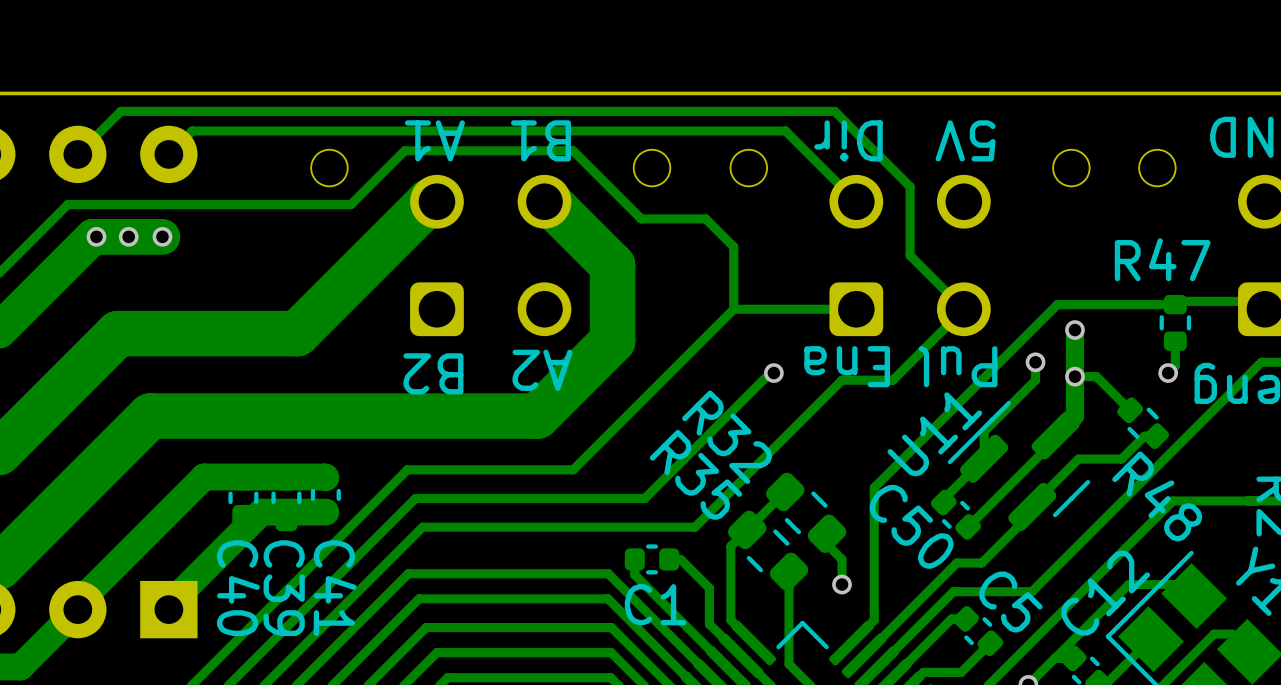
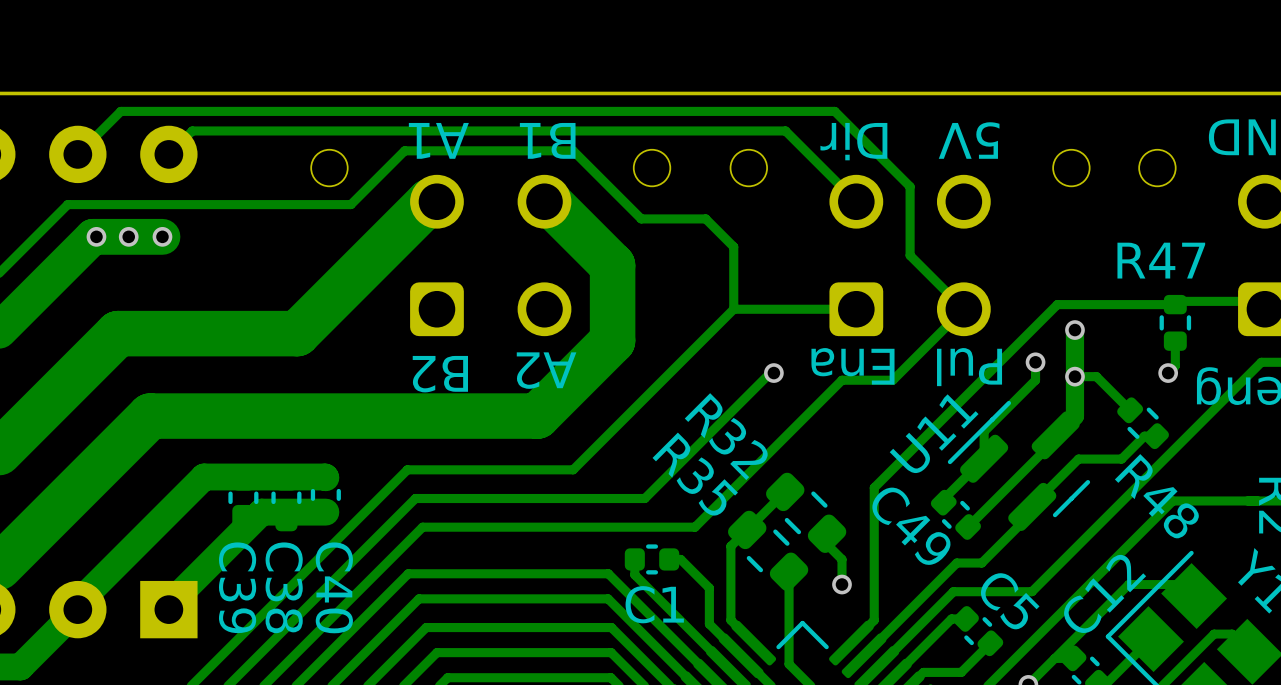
C50 name: C50 (911, 526) -> C49 (911, 526)
C40 name: C40 (238, 588) -> C39 (237, 587)
C39 name: C39 (284, 588) -> C38 (284, 587)
C41 name: C41 (335, 588) -> C40 (334, 587)

